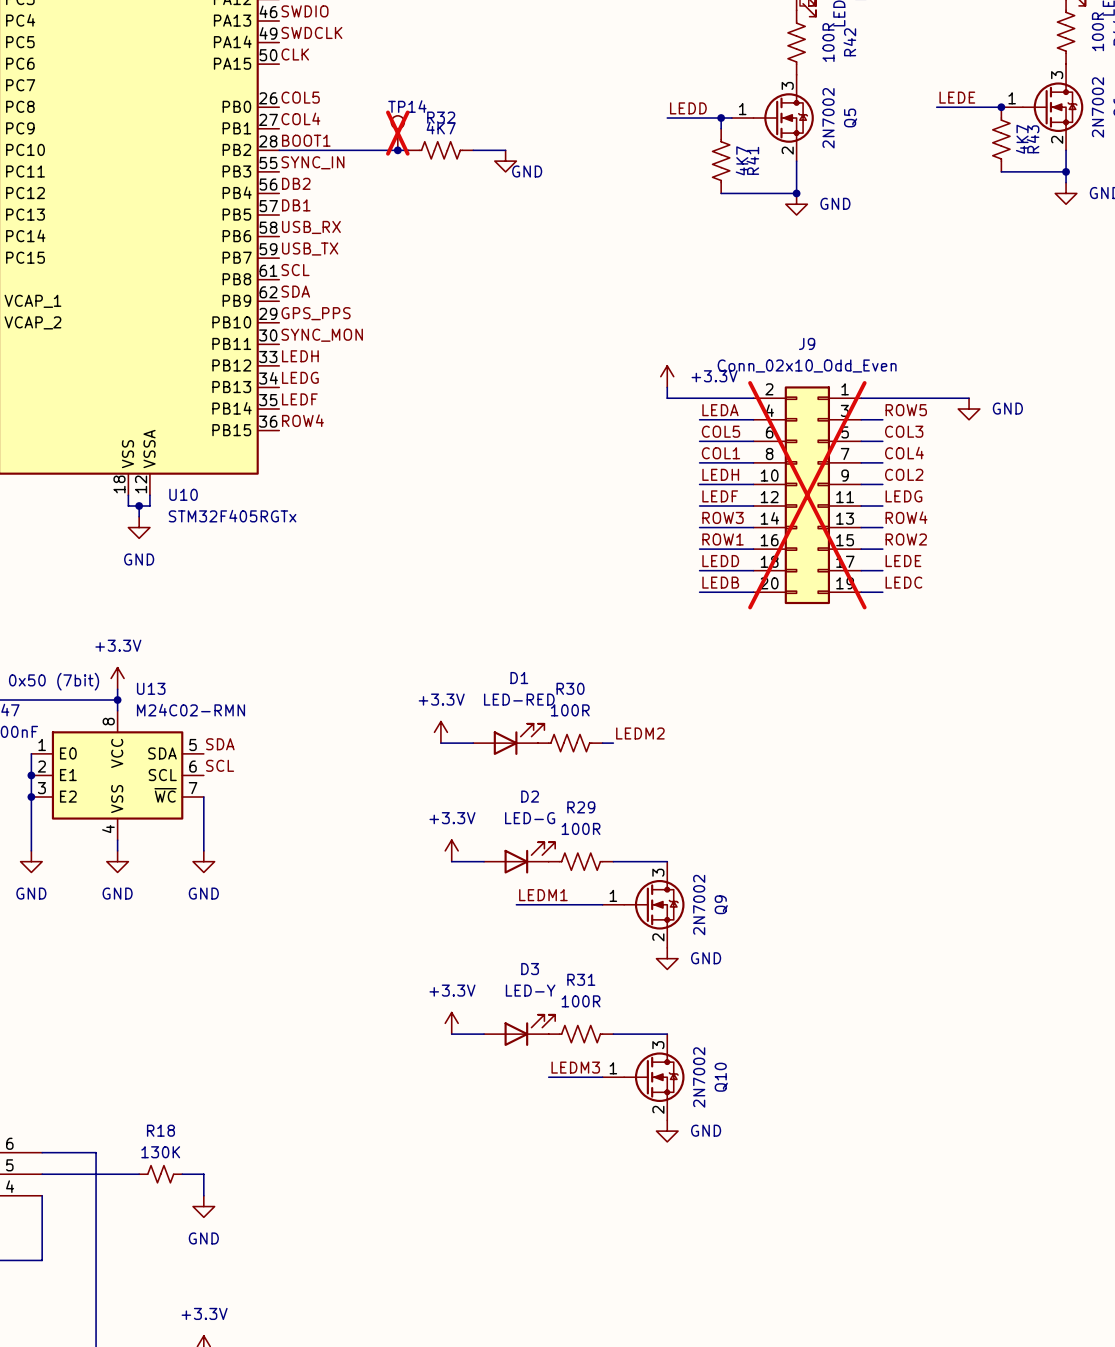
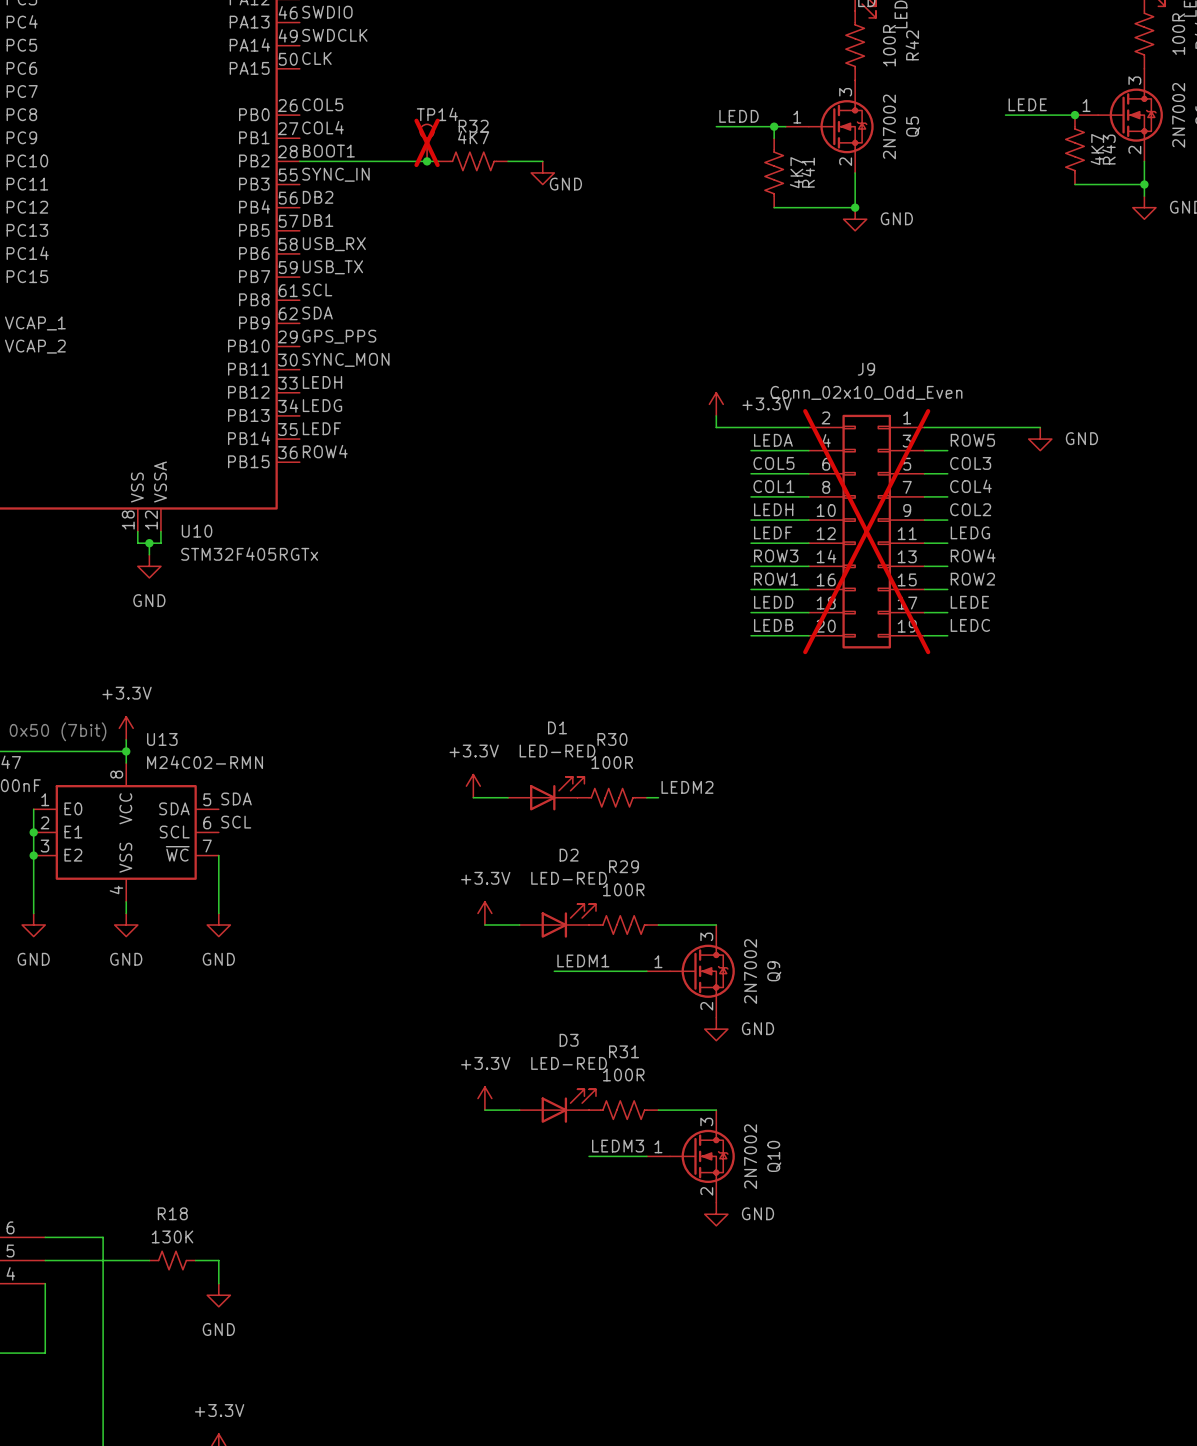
D2 value: LED-G (530, 818) -> LED-RED (569, 878)
D3 value: LED-Y (530, 990) -> LED-RED (569, 1063)

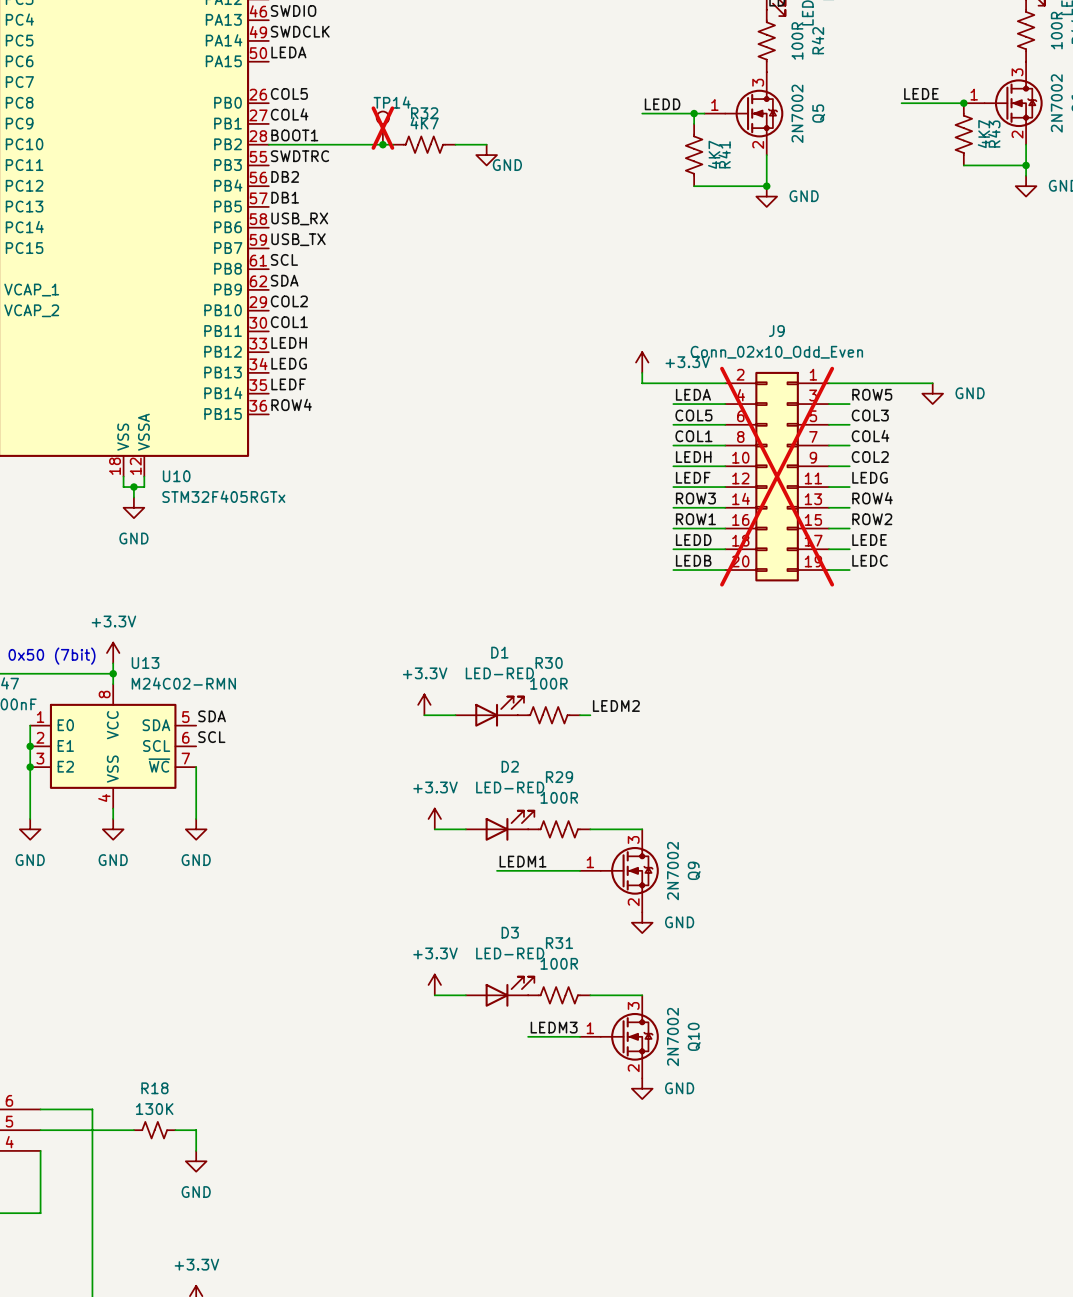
label: CLK (316, 58) -> LEDA (288, 52)
label: SYNC_IN (335, 174) -> SWDTRC (299, 156)
label: GPS_PPS (339, 336) -> COL2 (289, 301)
label: SYNC_MON (345, 359) -> COL1 (289, 322)

